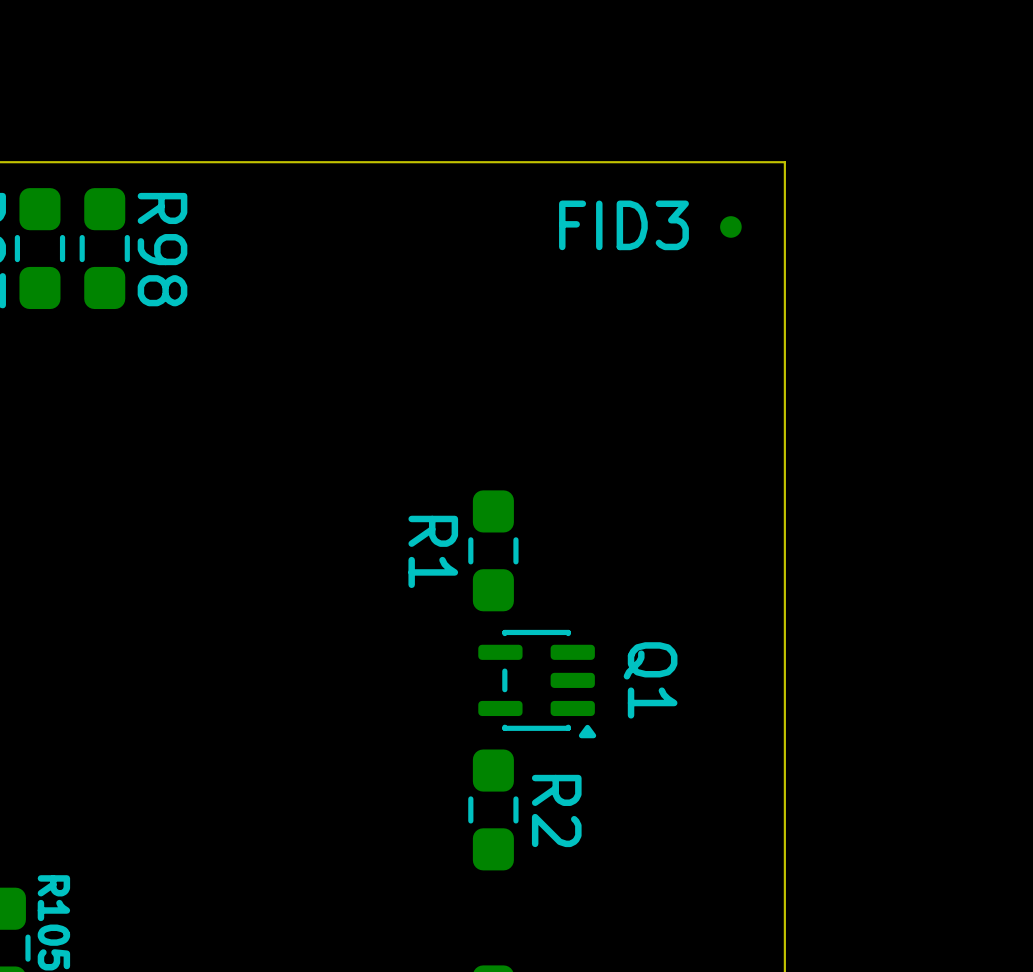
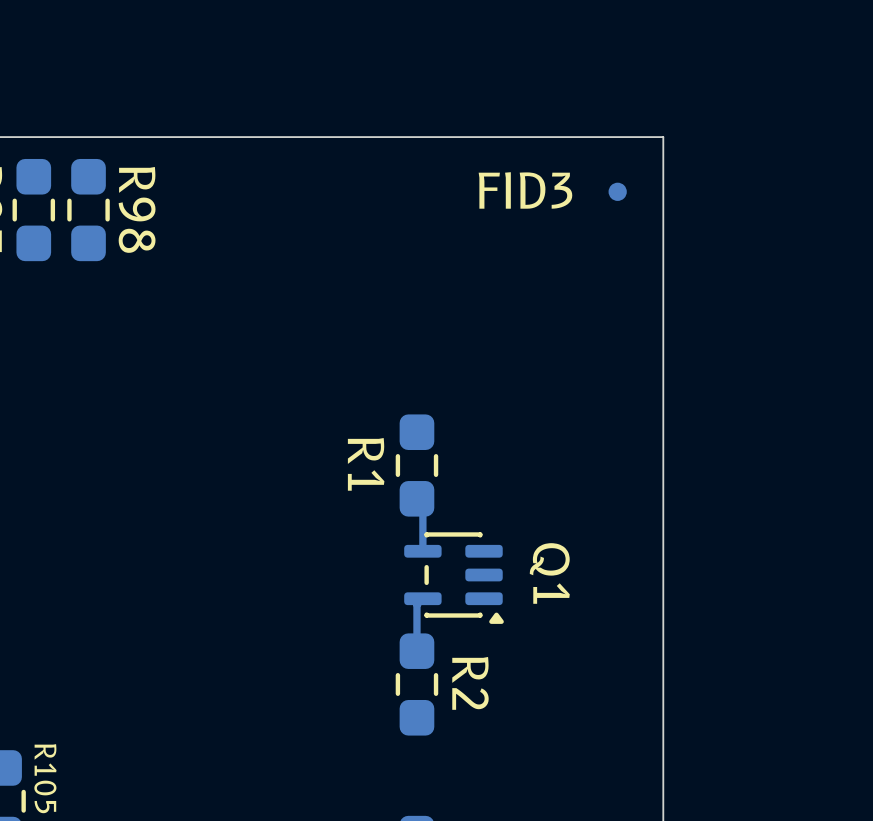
track: none -> (416, 498) (422, 504) (422, 551)
track: none -> (422, 598) (416, 604) (416, 651)

